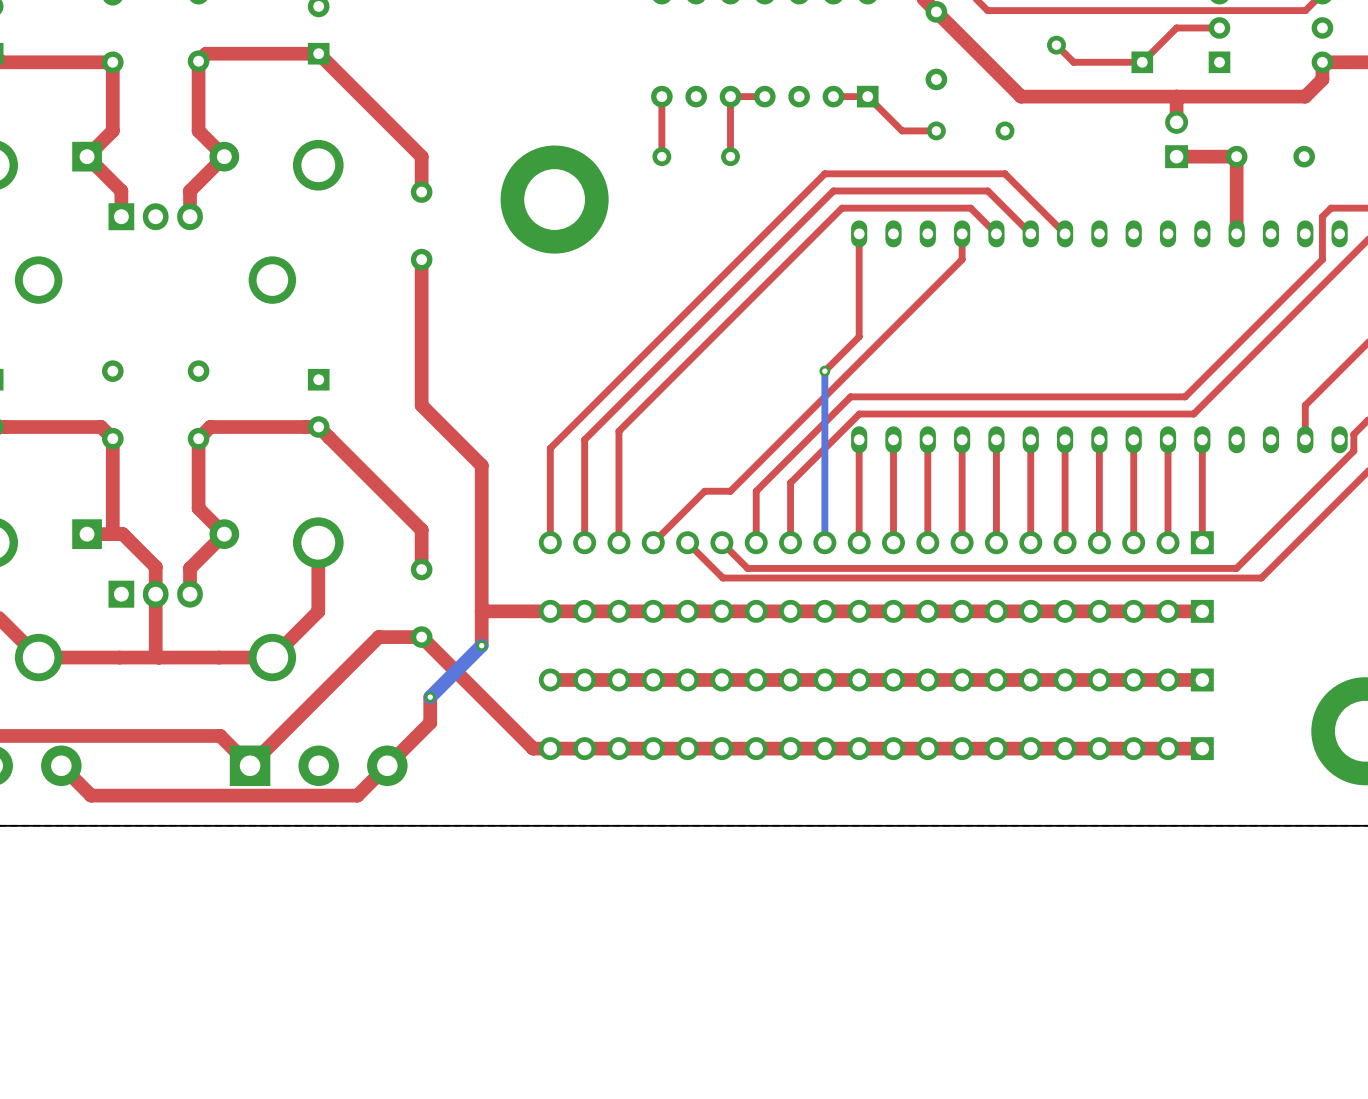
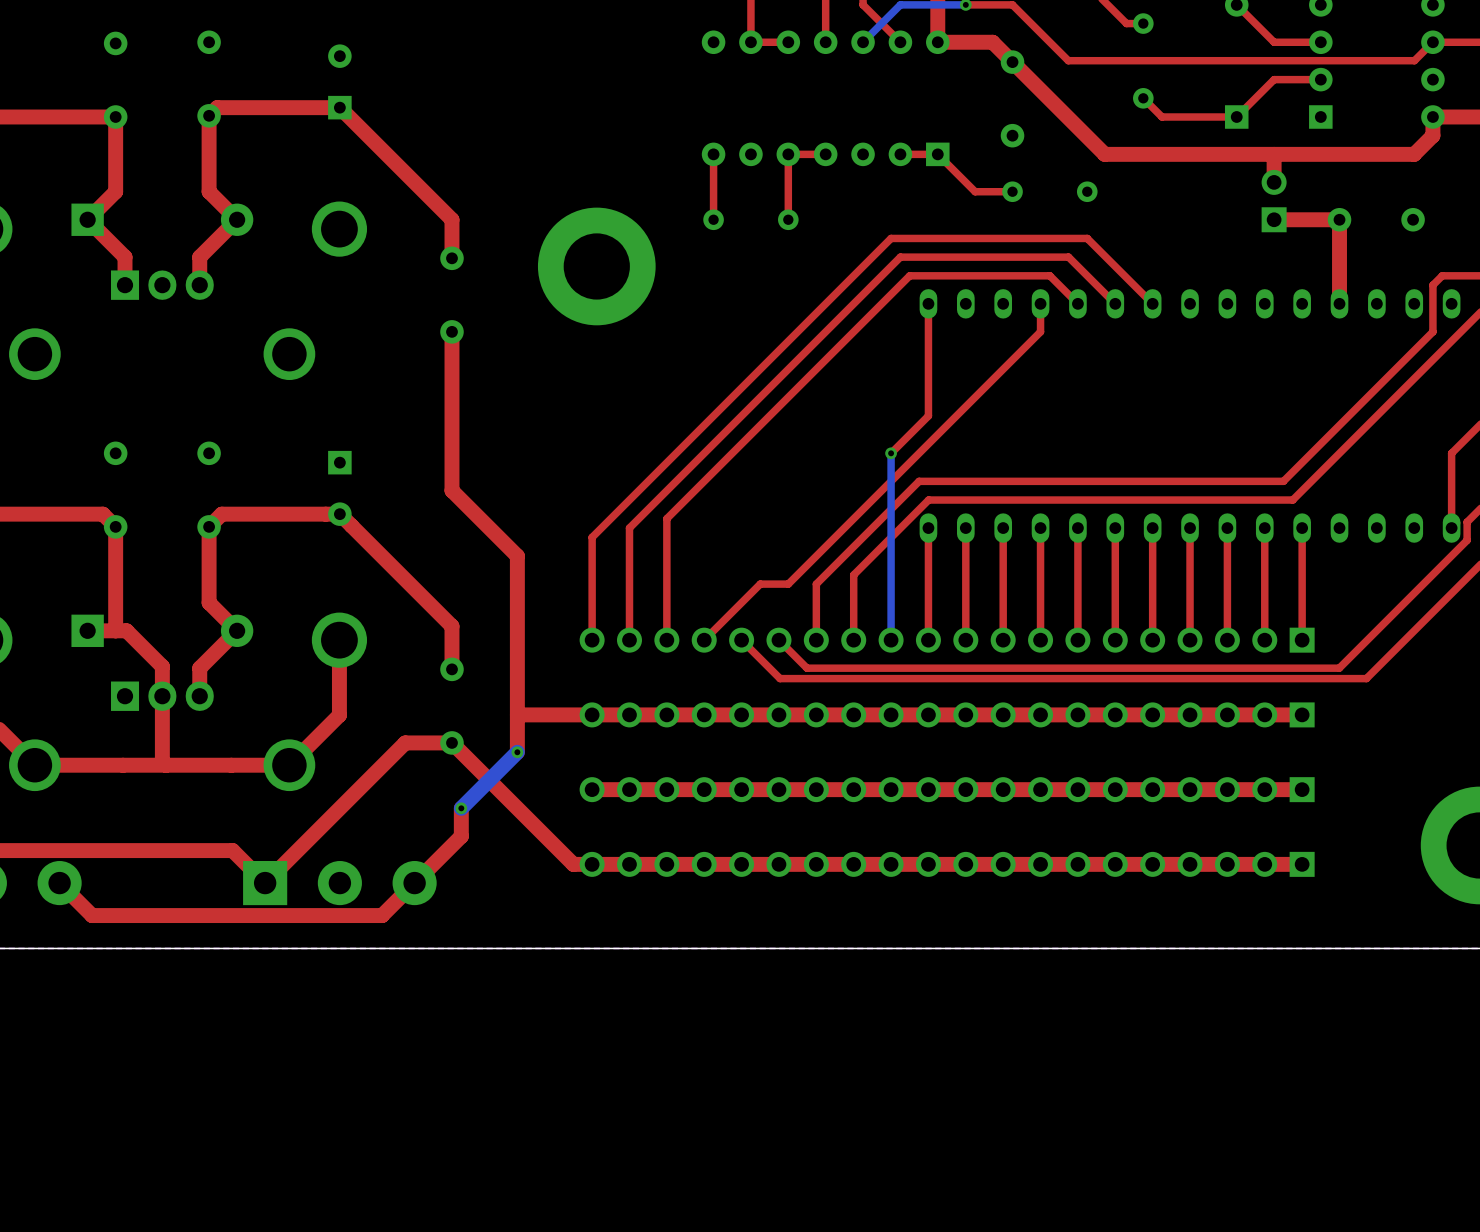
top track: (1339, 371) (1305, 405) (1305, 439) -> (1451, 453) (1451, 528)

